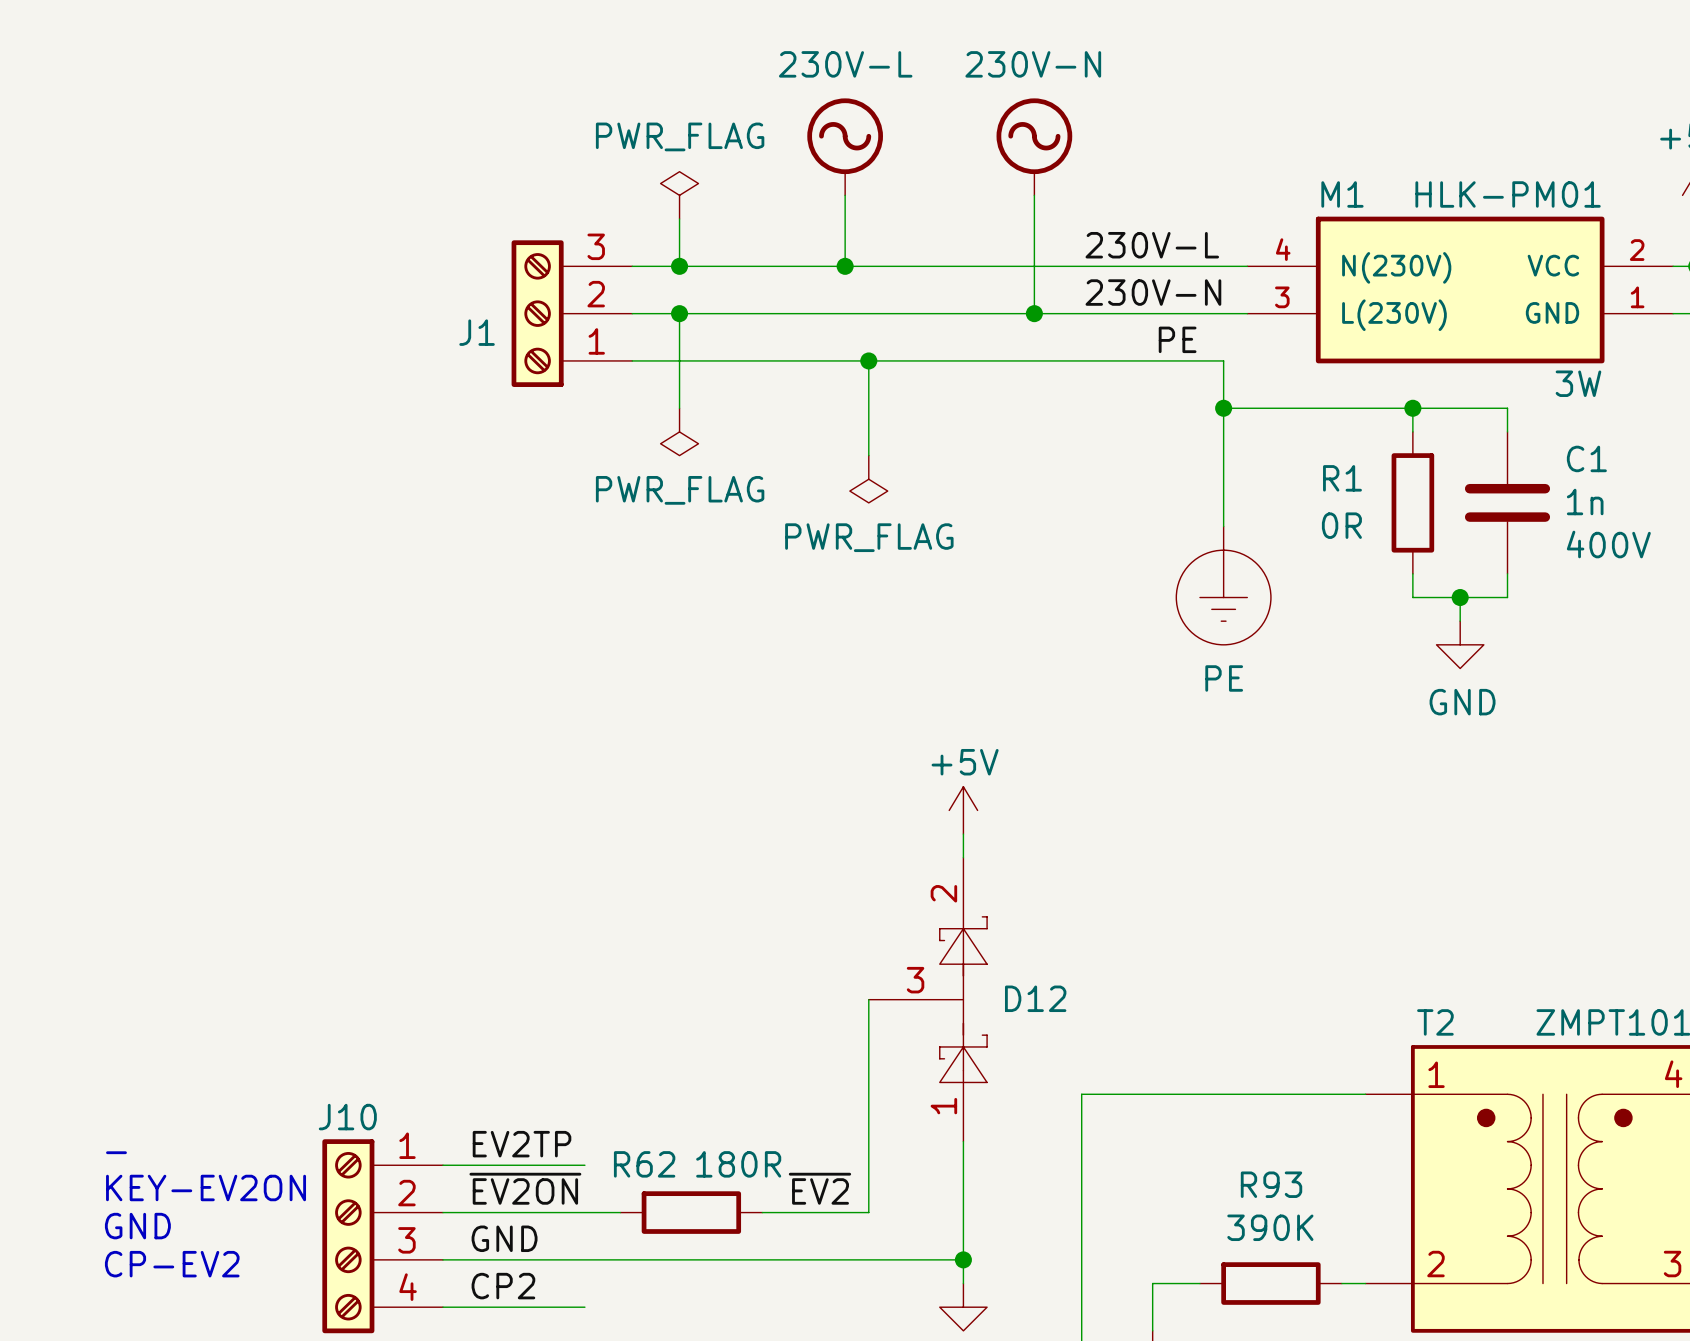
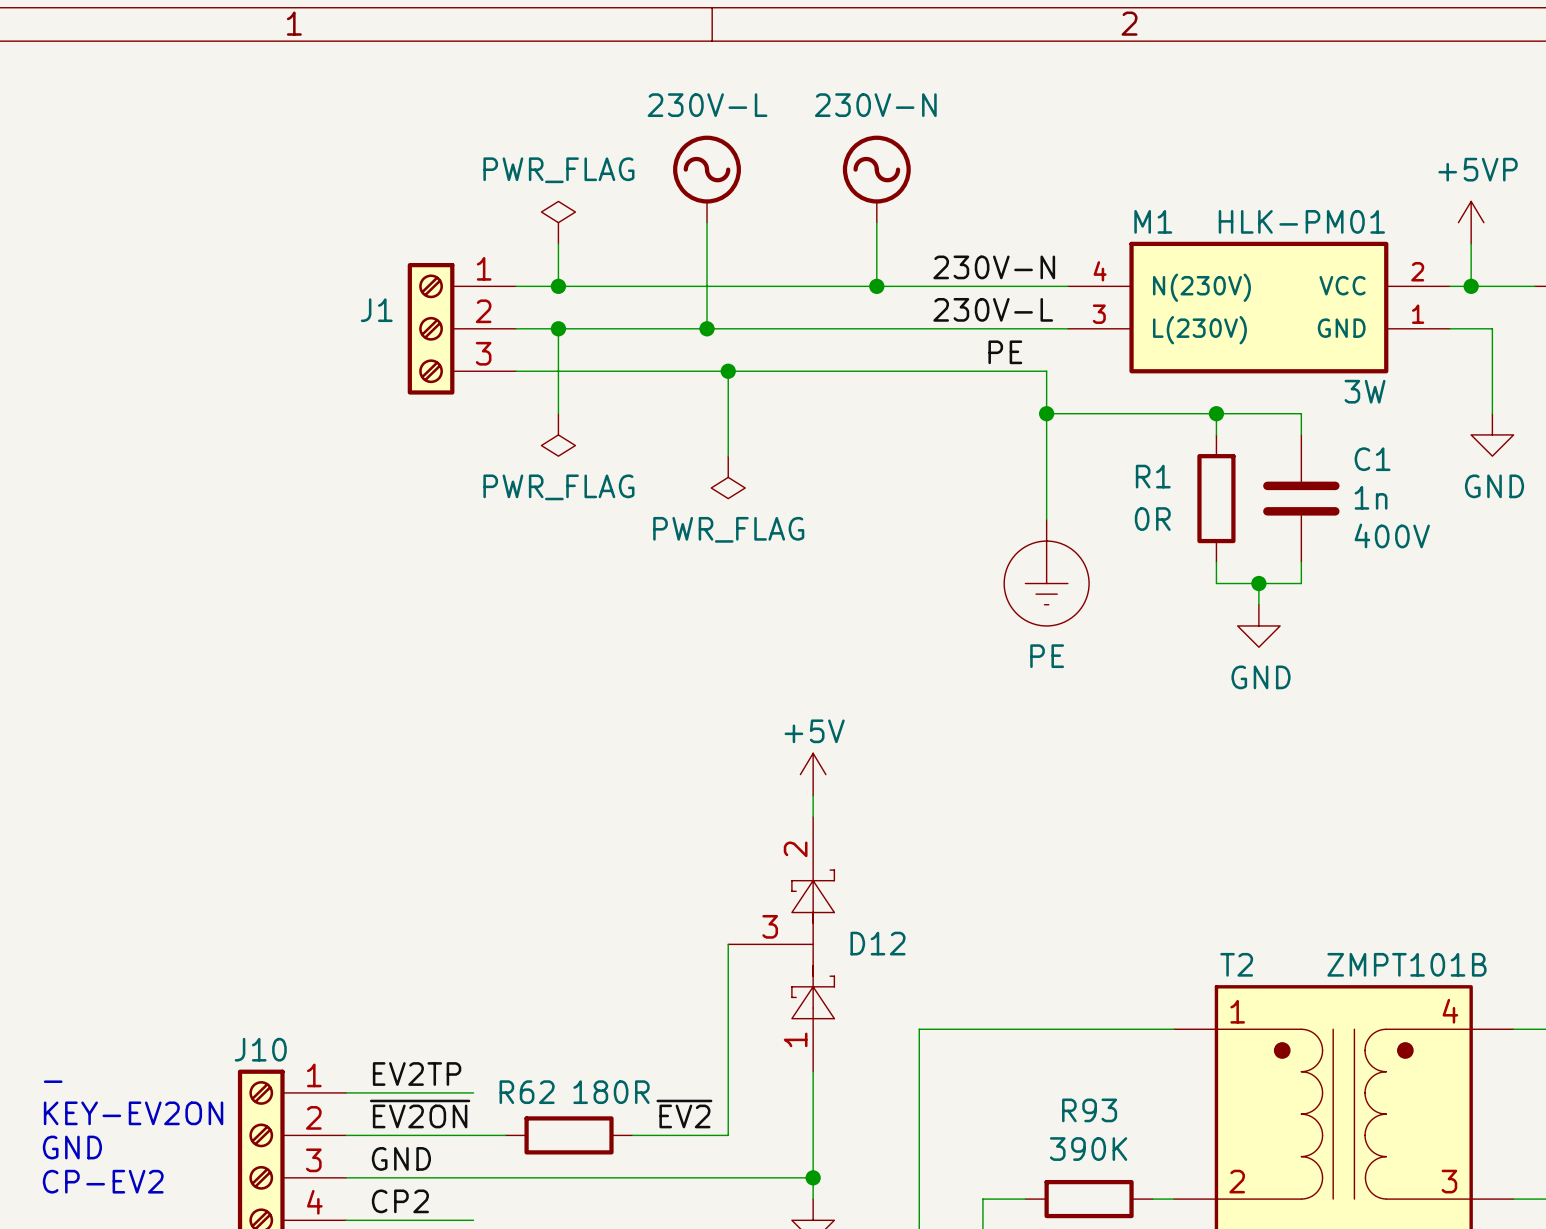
label: 230V-L (1152, 245) -> 230V-N (994, 267)
junction position: (845, 266) -> (707, 328)
wire: (1034, 266) (1034, 313) -> (707, 286) (707, 328)
label: 230V-N (1153, 292) -> 230V-L (993, 309)
J1 flip: as is (537, 313) -> up-down (431, 328)
junction position: (1034, 313) -> (876, 286)

